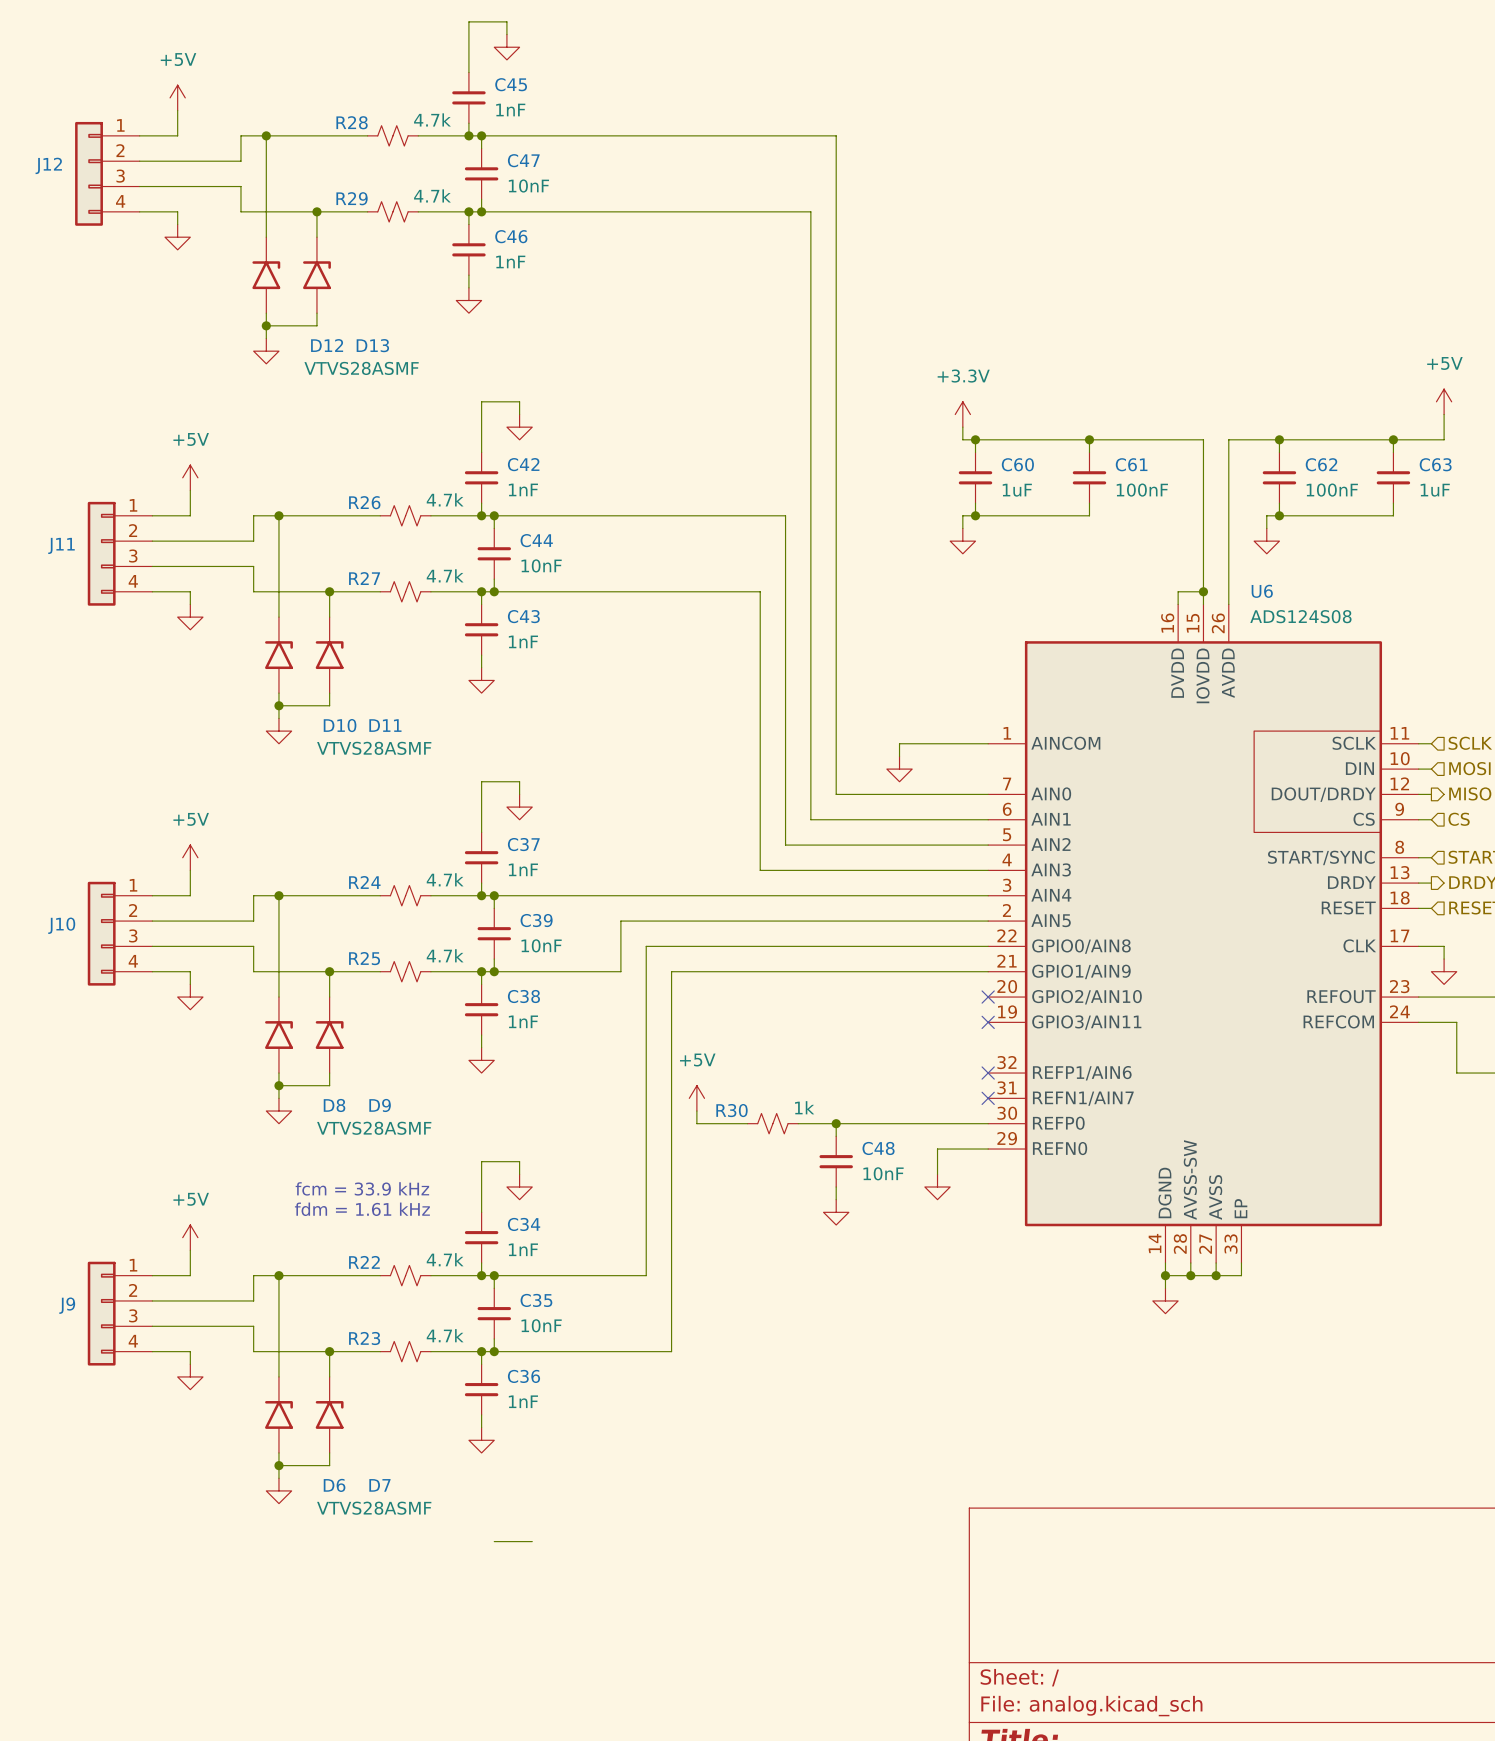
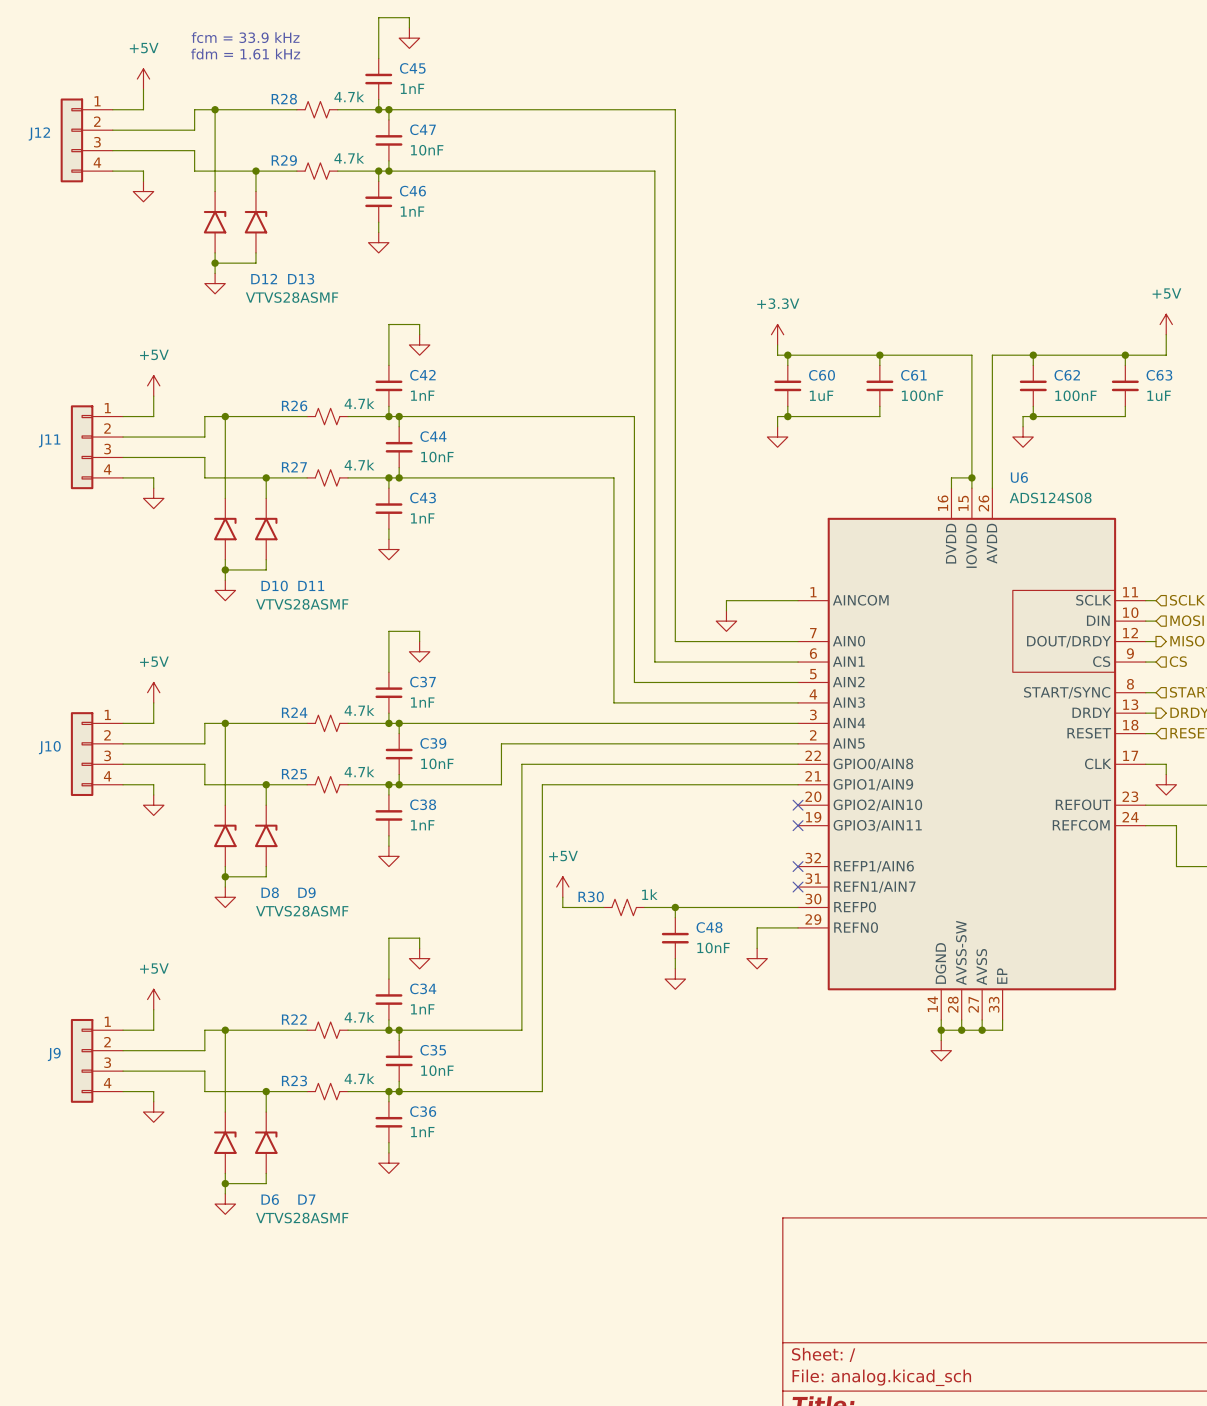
text: none -> fcm = 33.9 kHz (245, 37)
text: none -> fdm = 1.61 kHz (245, 54)
text: fcm = 33.9 kHz (362, 1188) -> none
text: fdm = 1.61 kHz (362, 1209) -> none
wire: (494, 1541) (532, 1541) -> none

